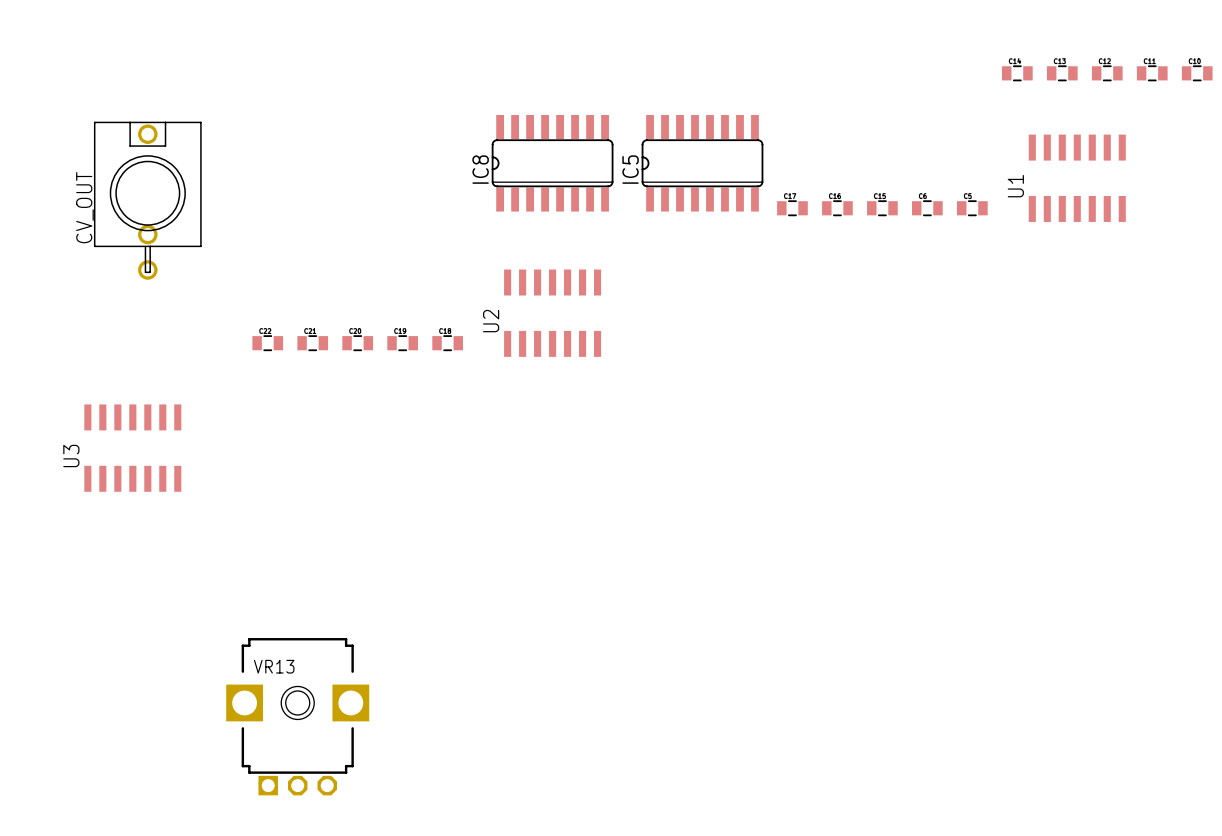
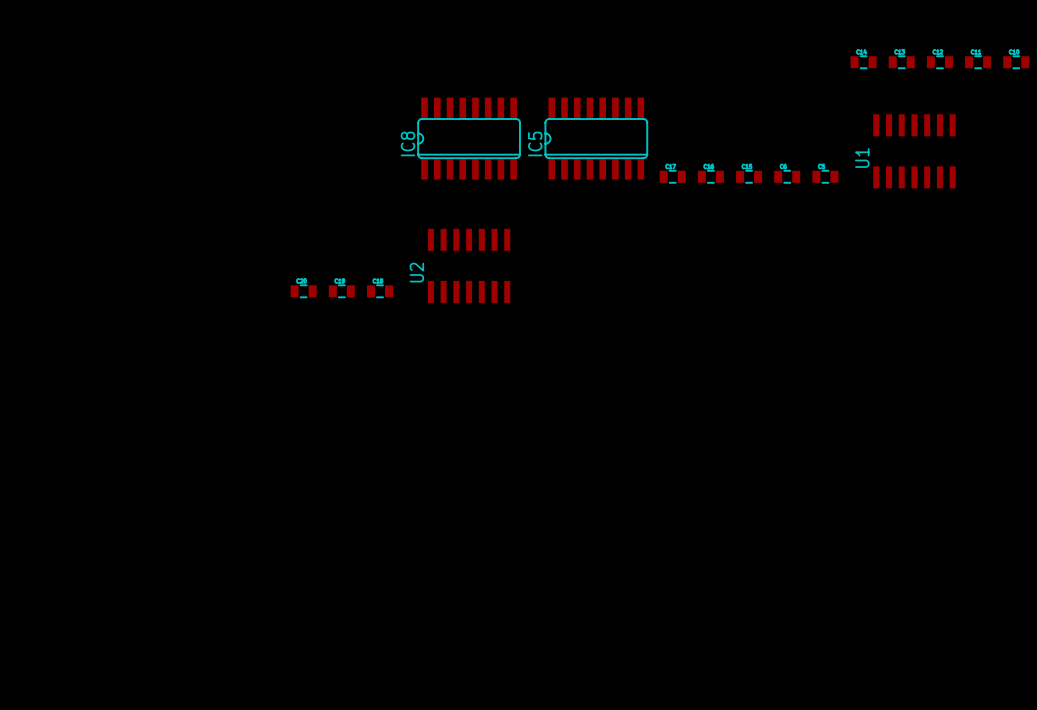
CV_OUT: (147, 200) -> none
part: (267, 343) -> none
part: (312, 343) -> none
U3: (132, 448) -> none
VR13: (297, 716) -> none

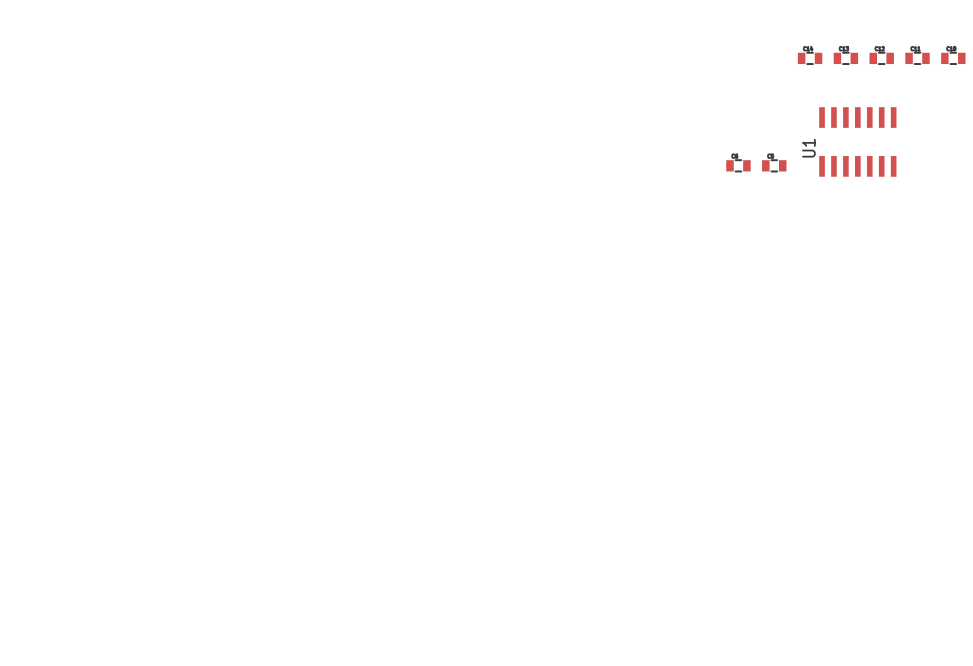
IC8: (469, 138) -> none
IC5: (596, 138) -> none
part: (672, 176) -> none
part: (710, 176) -> none
part: (749, 176) -> none
U2: (469, 265) -> none
part: (303, 291) -> none
part: (341, 291) -> none
part: (379, 291) -> none

